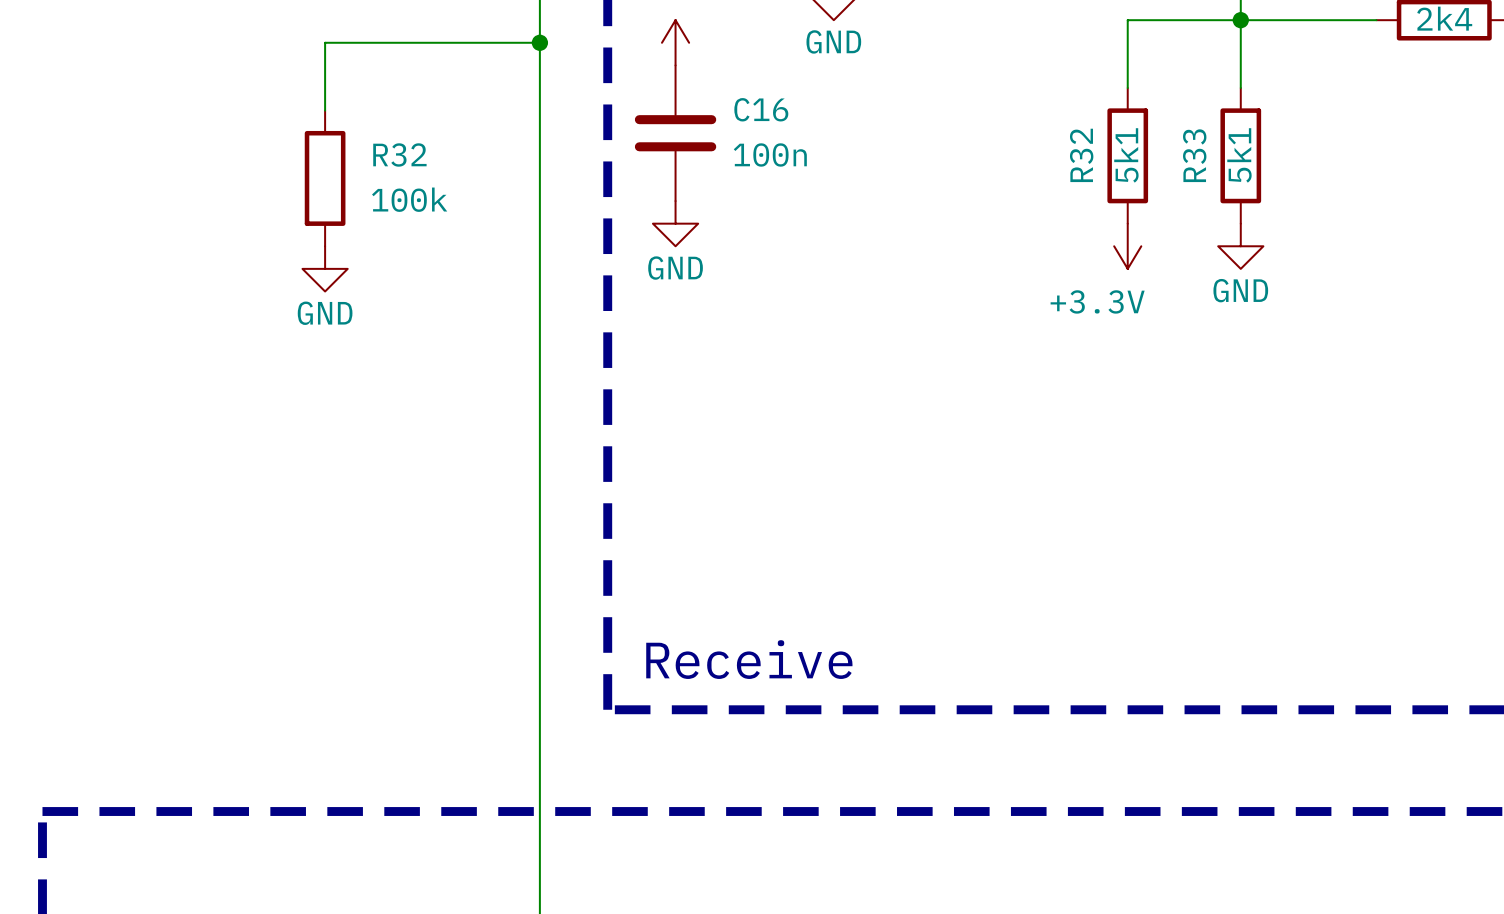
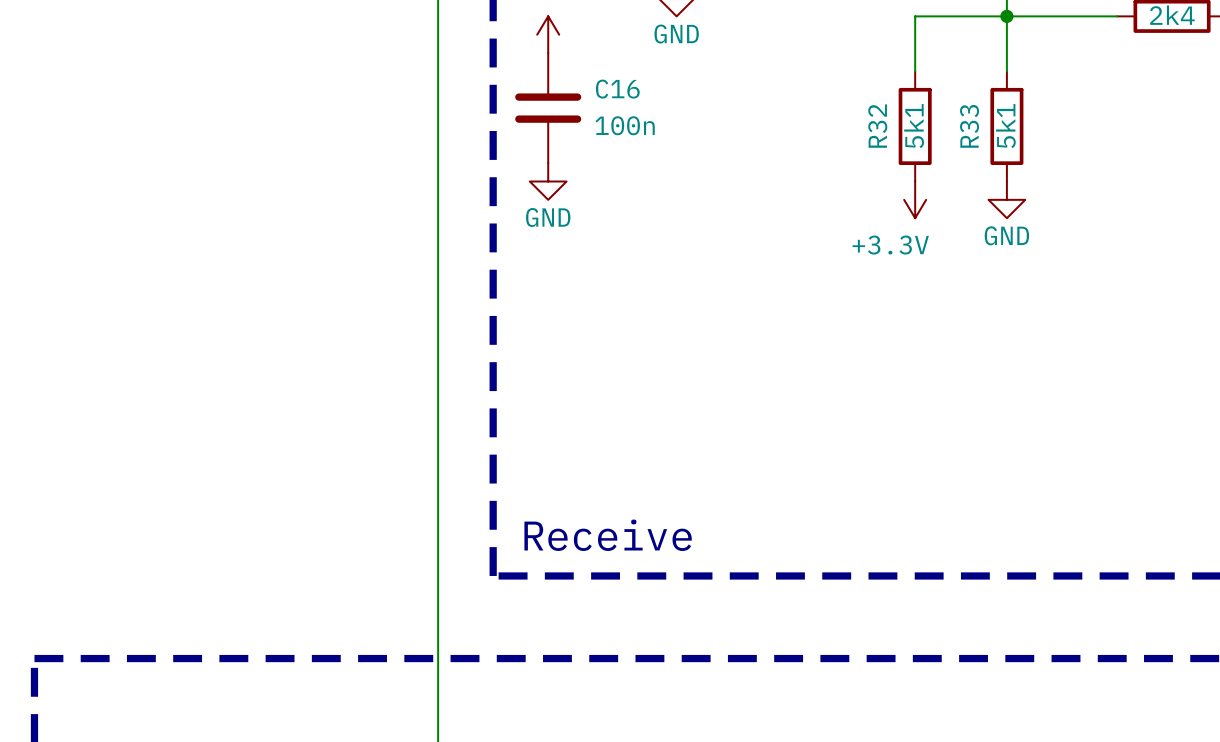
wire: (539, 42) (325, 42) (325, 110) -> none
junction: (539, 42) -> none
R32: 100k (325, 178) -> none
power symbol: GND (325, 268) -> none

